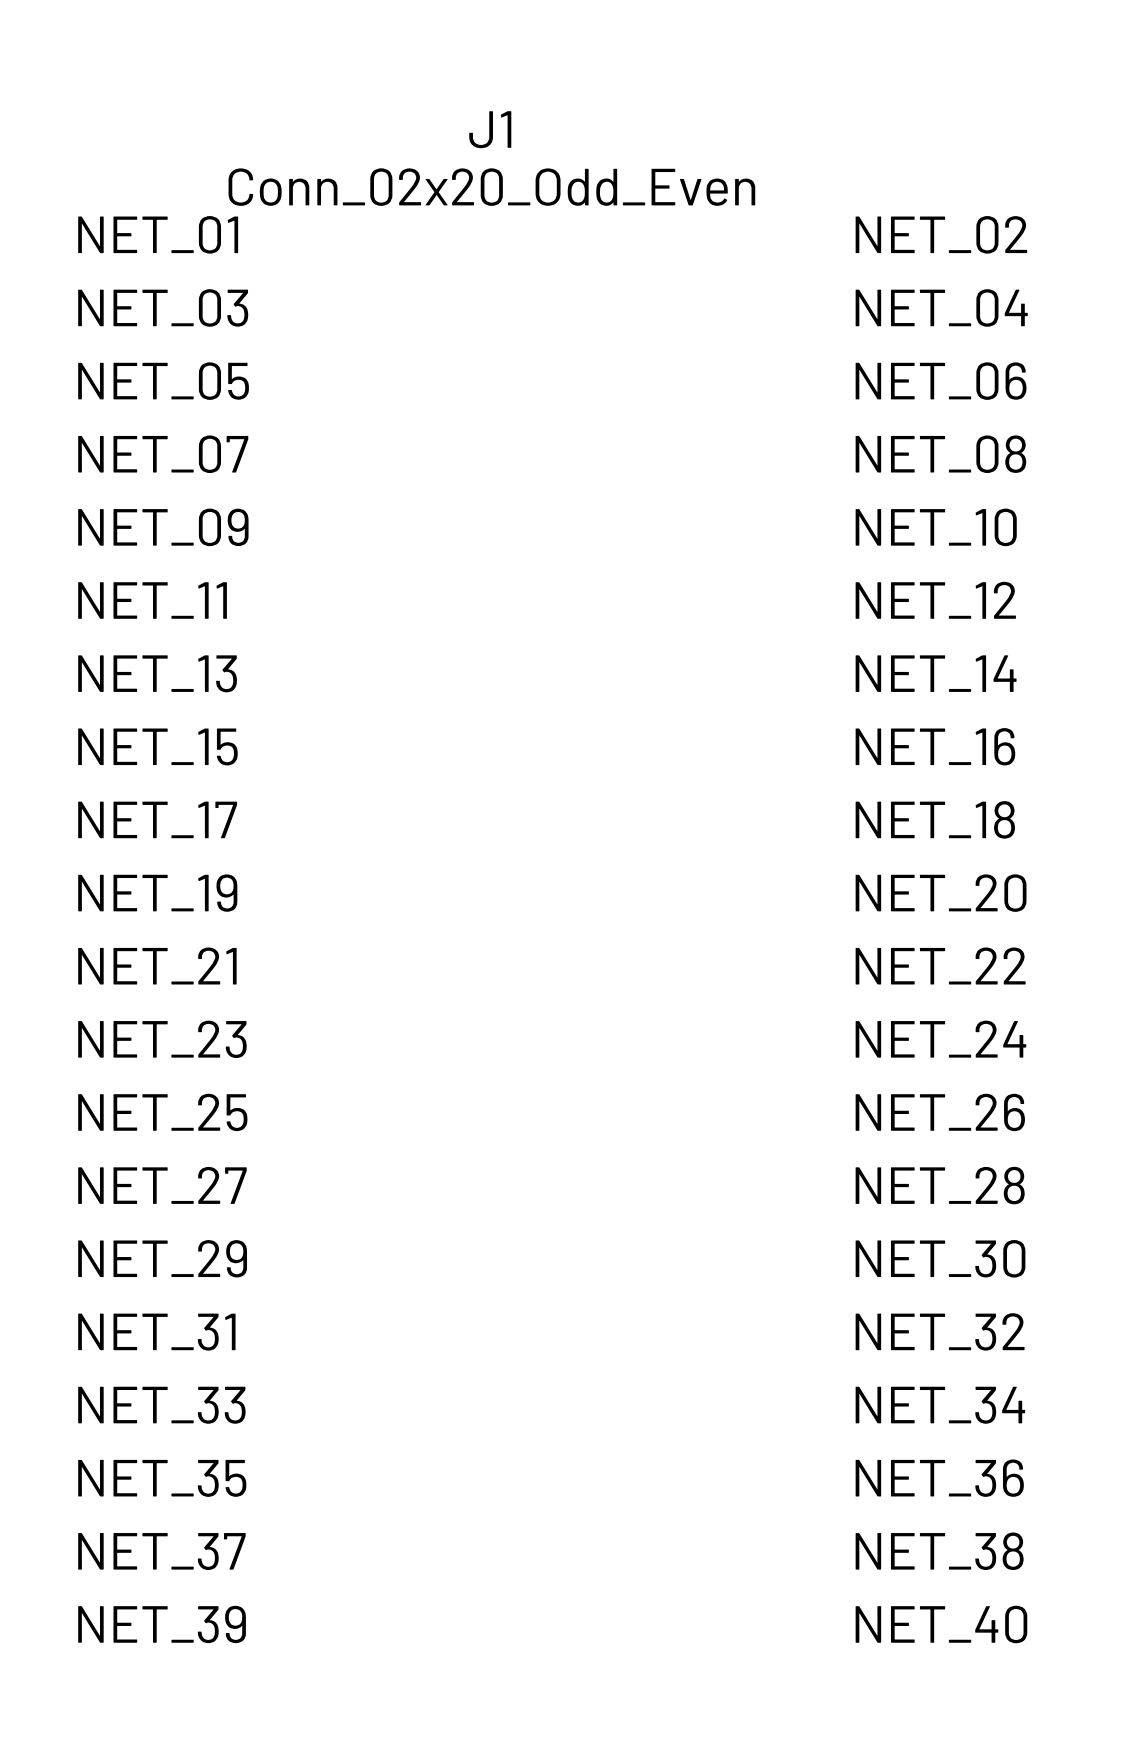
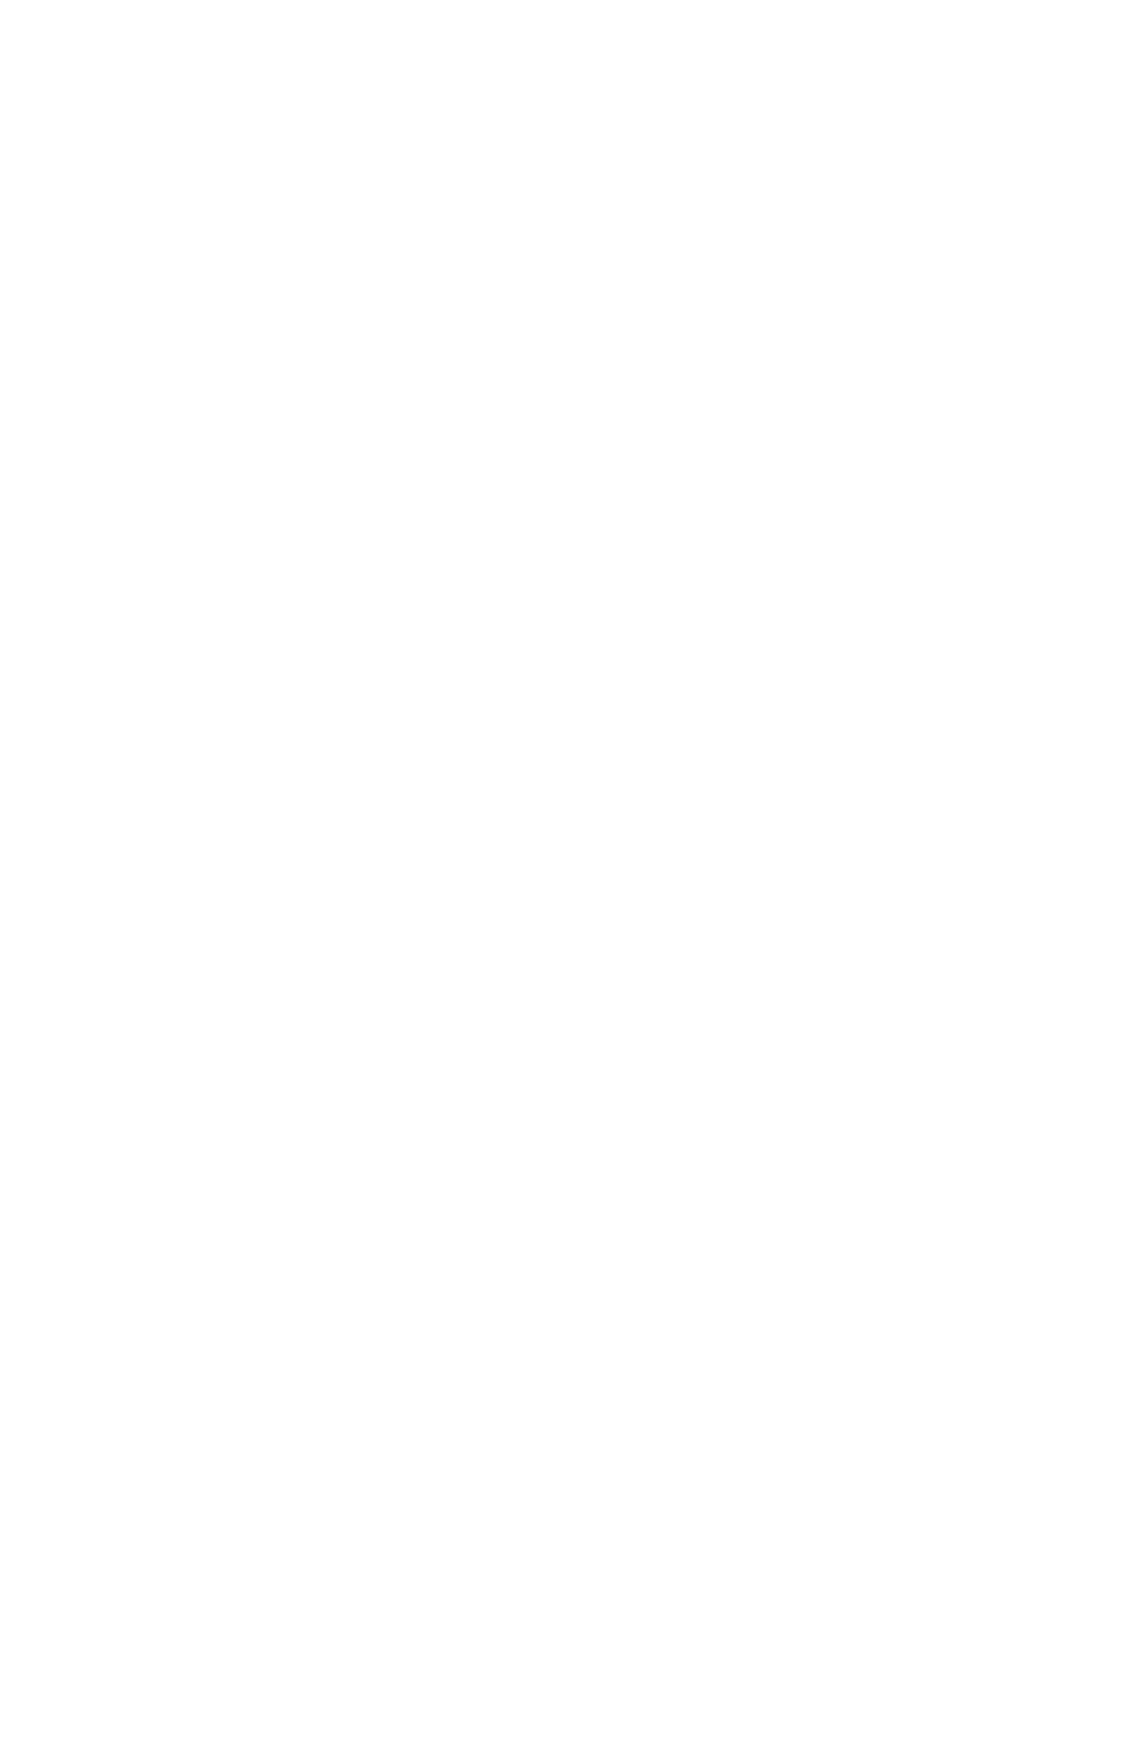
J1: Conn_02x20_Odd_Even (491, 158) -> none
label: NET_01 (158, 234) -> none
label: NET_02 (941, 234) -> none
label: NET_03 (163, 307) -> none
label: NET_04 (941, 307) -> none
label: NET_05 (163, 381) -> none
label: NET_06 (941, 381) -> none
label: NET_07 (163, 454) -> none
label: NET_08 (940, 454) -> none
label: NET_09 (163, 527) -> none
label: NET_10 (936, 527) -> none
label: NET_11 (152, 600) -> none
label: NET_12 (935, 600) -> none
label: NET_13 (157, 673) -> none
label: NET_14 (936, 673) -> none
label: NET_15 (157, 746) -> none
label: NET_16 (935, 746) -> none
label: NET_17 (157, 819) -> none
label: NET_18 (935, 819) -> none
label: NET_19 (157, 893) -> none
label: NET_20 (941, 893) -> none
label: NET_21 (157, 965) -> none
label: NET_22 (940, 965) -> none
label: NET_23 (162, 1039) -> none
label: NET_24 (940, 1039) -> none
label: NET_25 (162, 1112) -> none
label: NET_26 (940, 1112) -> none
label: NET_27 (162, 1185) -> none
label: NET_28 (940, 1185) -> none
label: NET_29 (162, 1258) -> none
label: NET_30 (940, 1258) -> none
label: NET_32 (940, 1331) -> none
label: NET_31 (156, 1332) -> none
label: NET_33 (161, 1405) -> none
label: NET_34 (940, 1405) -> none
label: NET_35 (162, 1478) -> none
label: NET_36 (939, 1478) -> none
label: NET_37 (161, 1551) -> none
label: NET_38 (939, 1551) -> none
label: NET_39 (162, 1624) -> none
label: NET_40 (941, 1624) -> none

